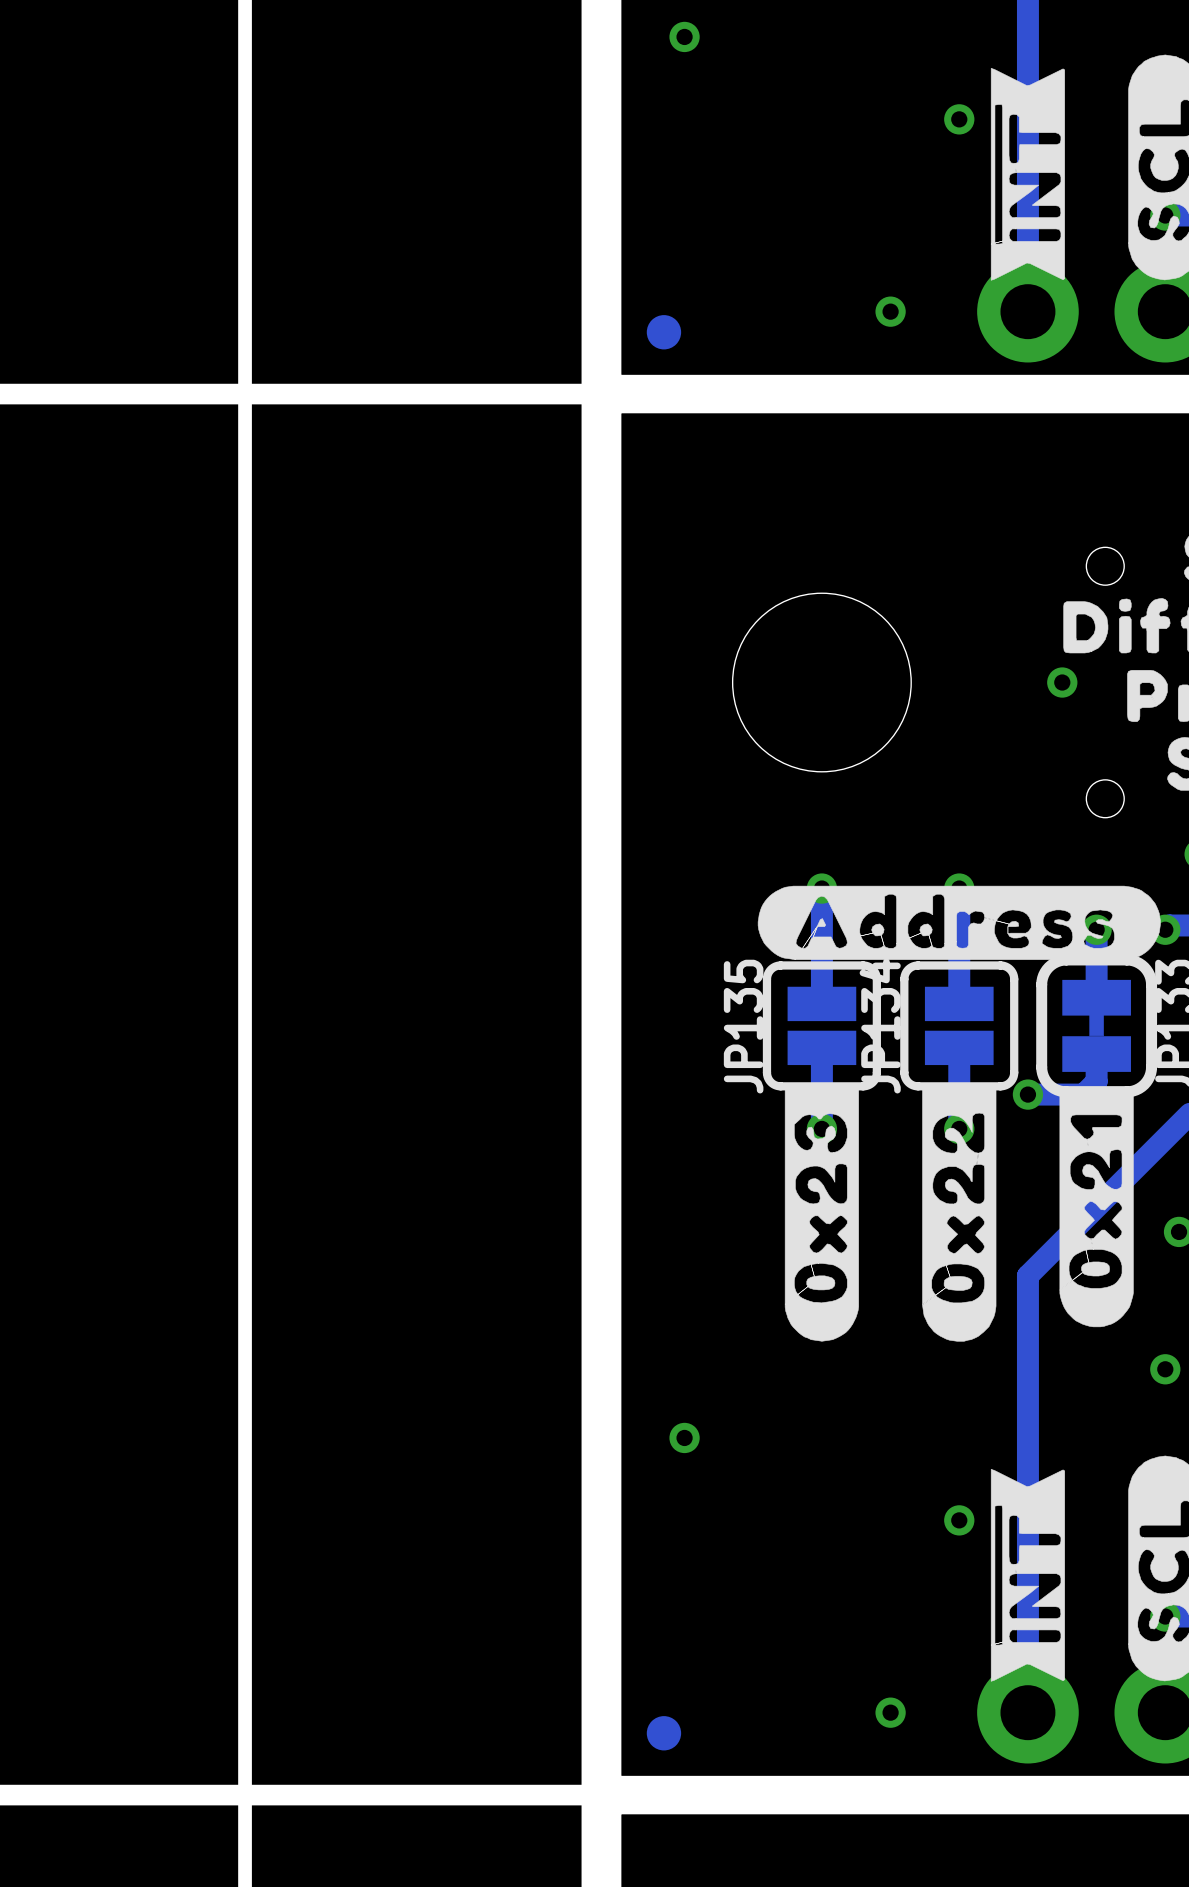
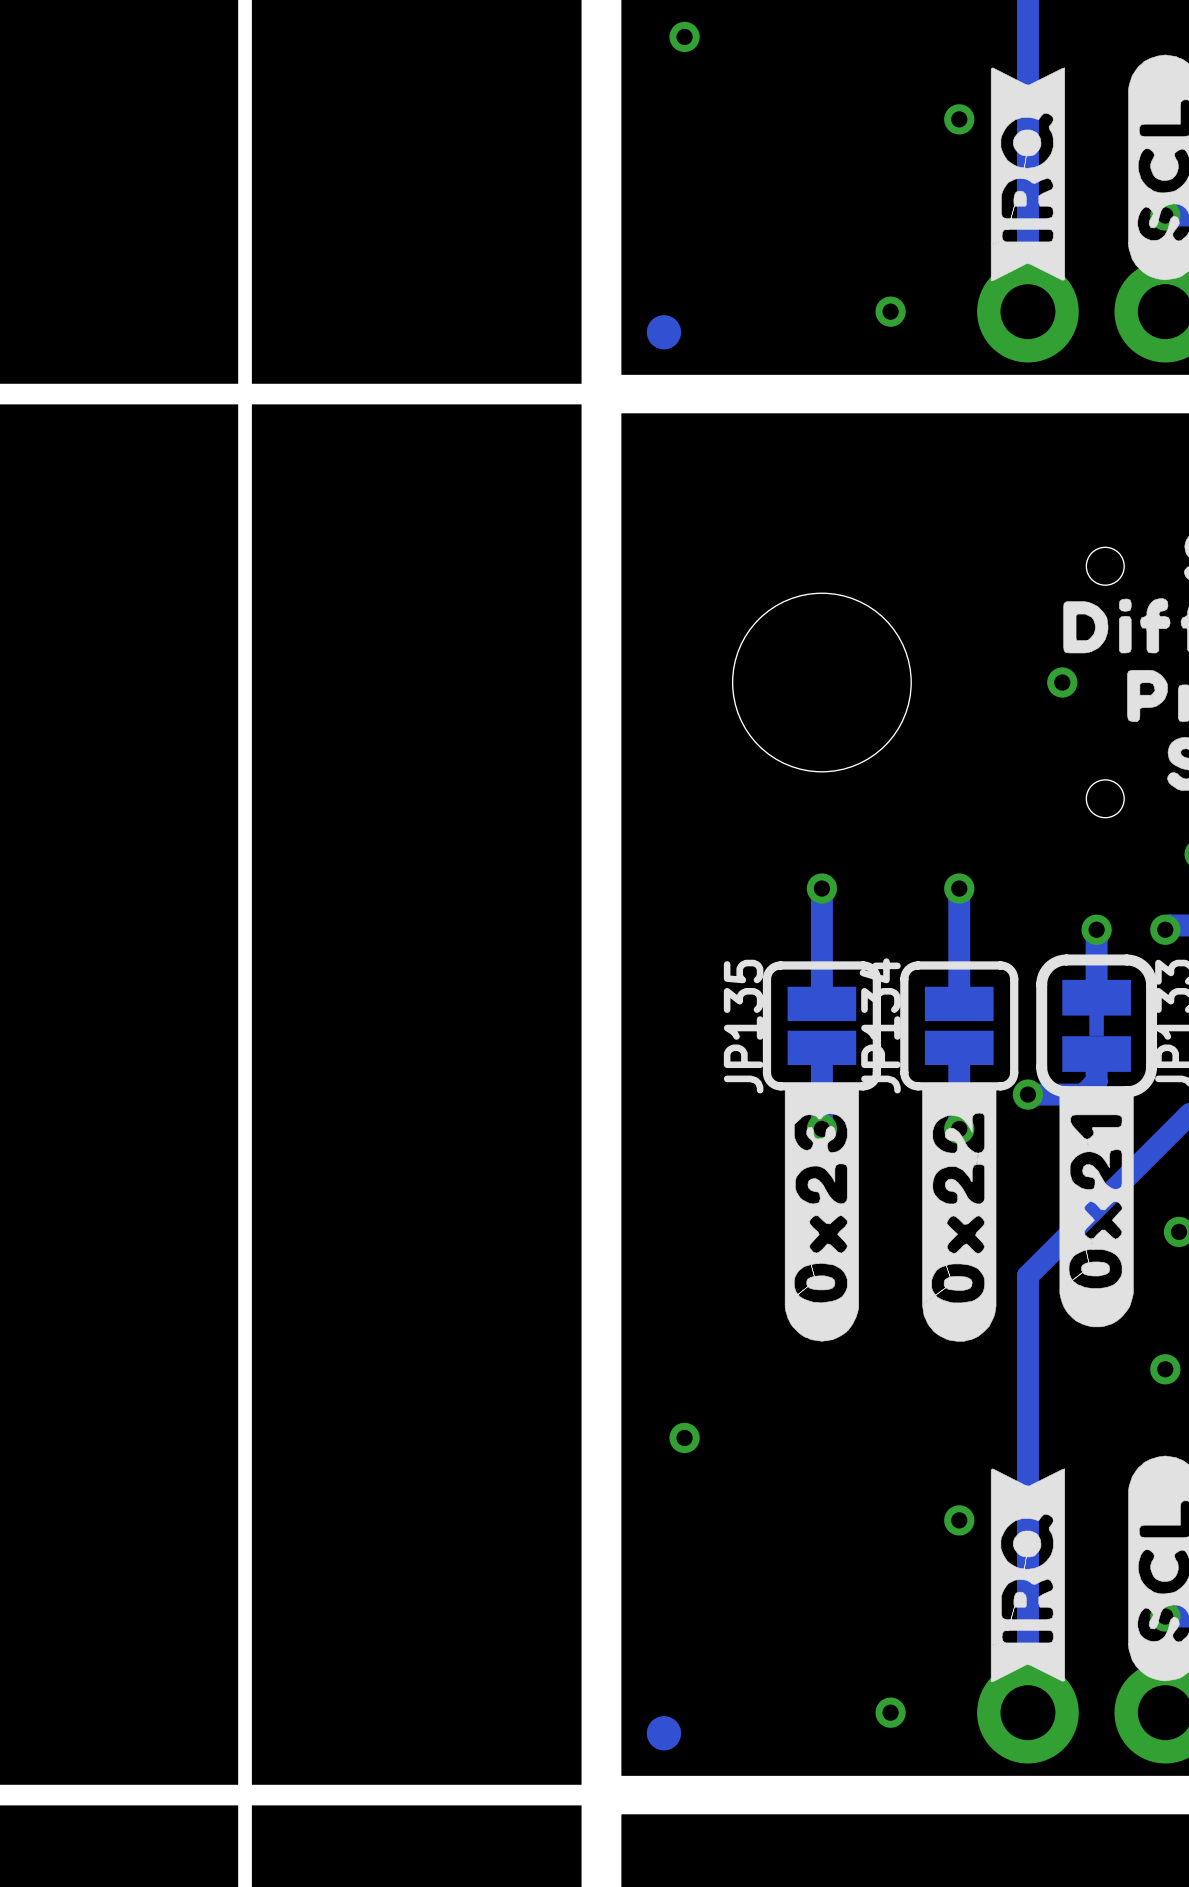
drawing shape: [990, 68, 1065, 281] -> [990, 67, 1065, 282]
drawing: [757, 885, 1161, 960] -> none
drawing shape: [990, 1469, 1065, 1682] -> [990, 1468, 1065, 1683]

